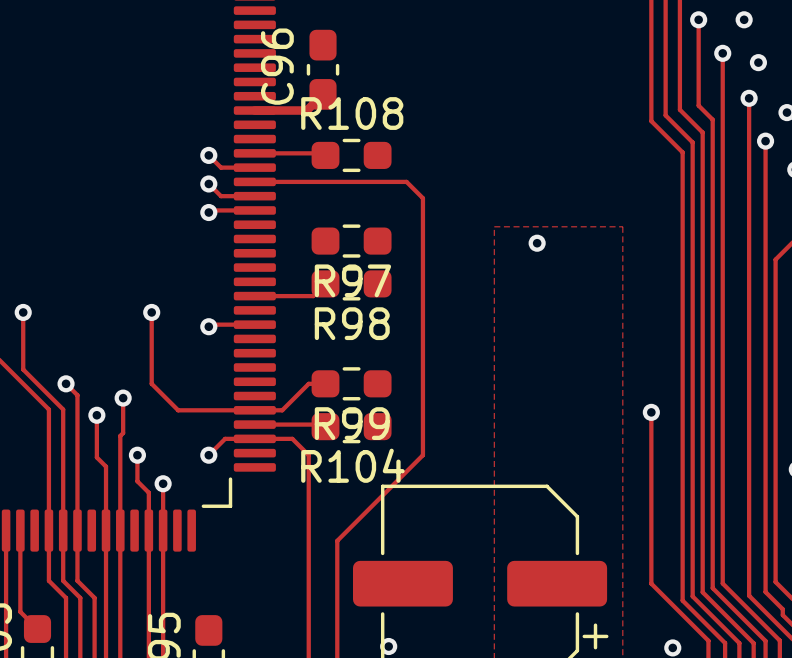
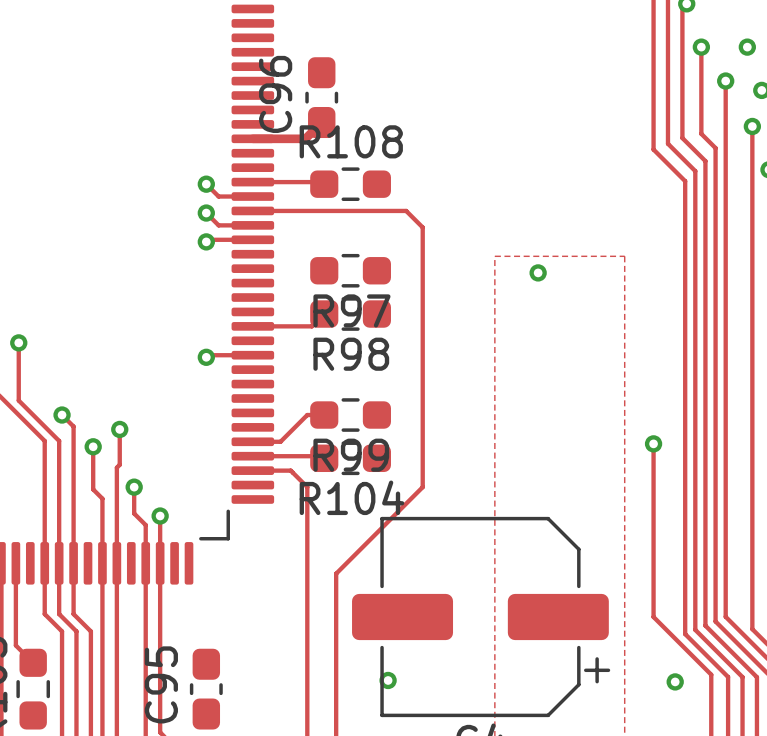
track: (151, 312) (151, 383) (178, 410) (254, 410) -> none
via: (151, 312) -> none
track: (254, 438) (225, 438) (208, 455) -> none
via: (208, 455) -> none

